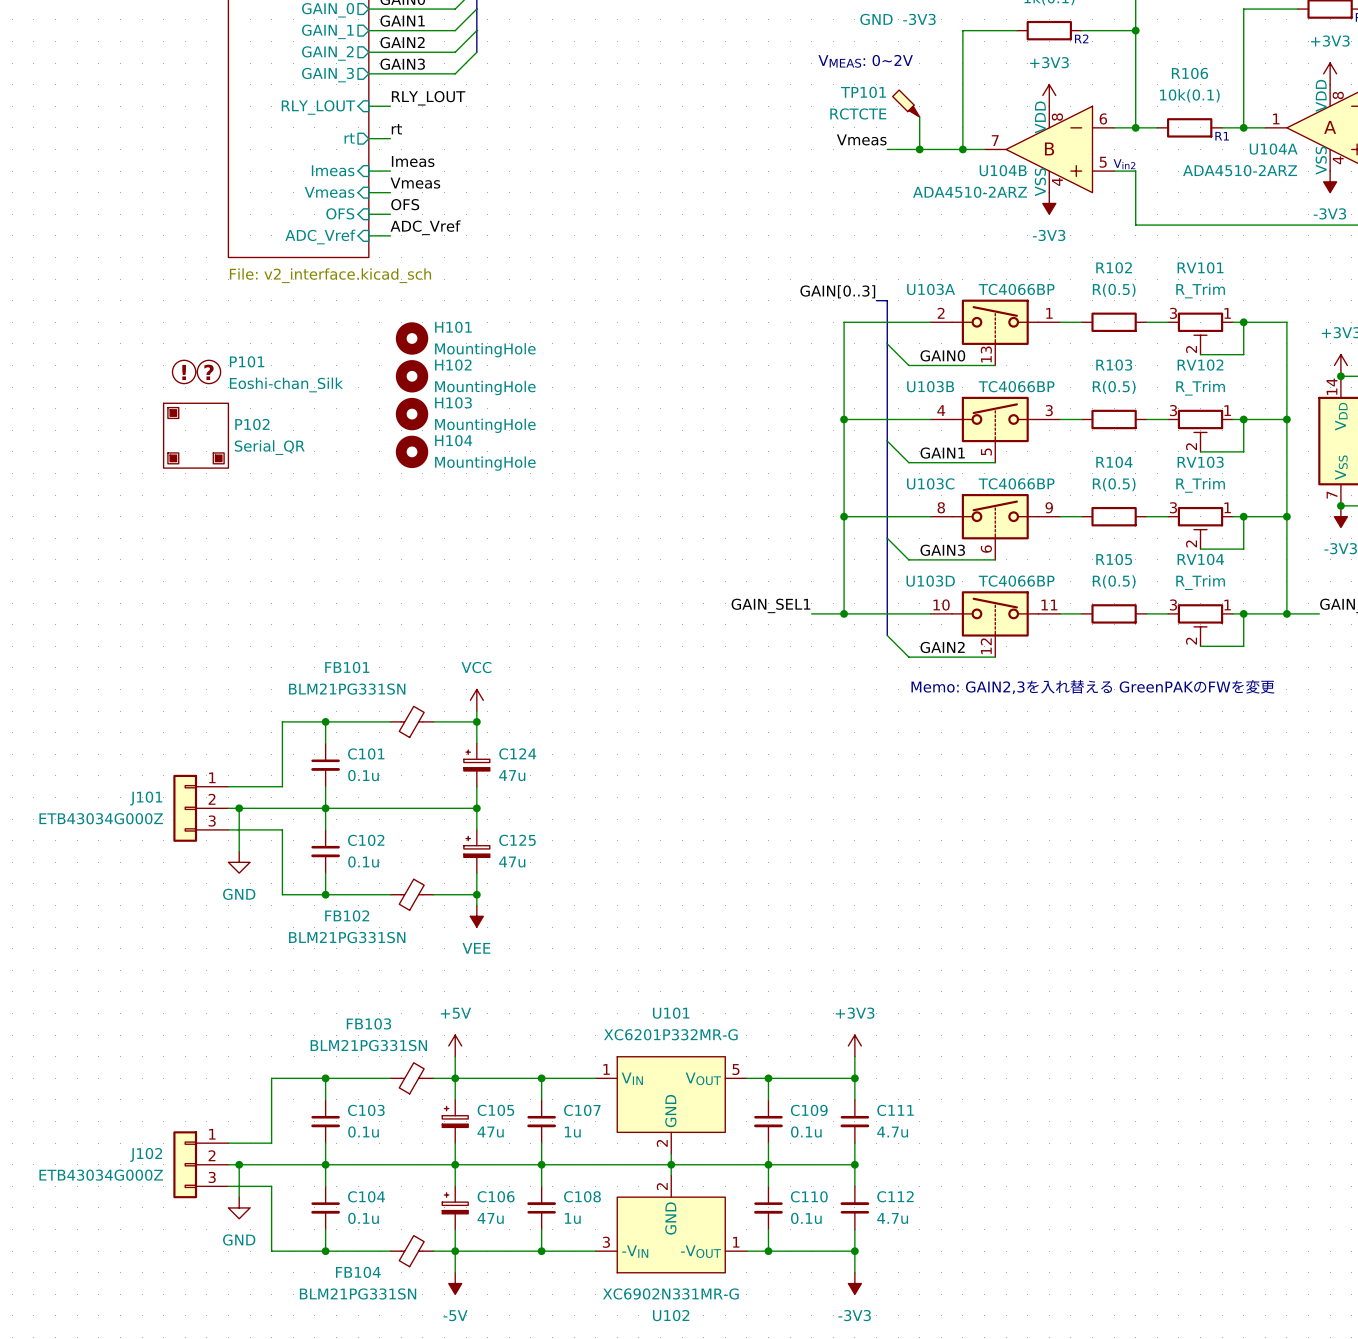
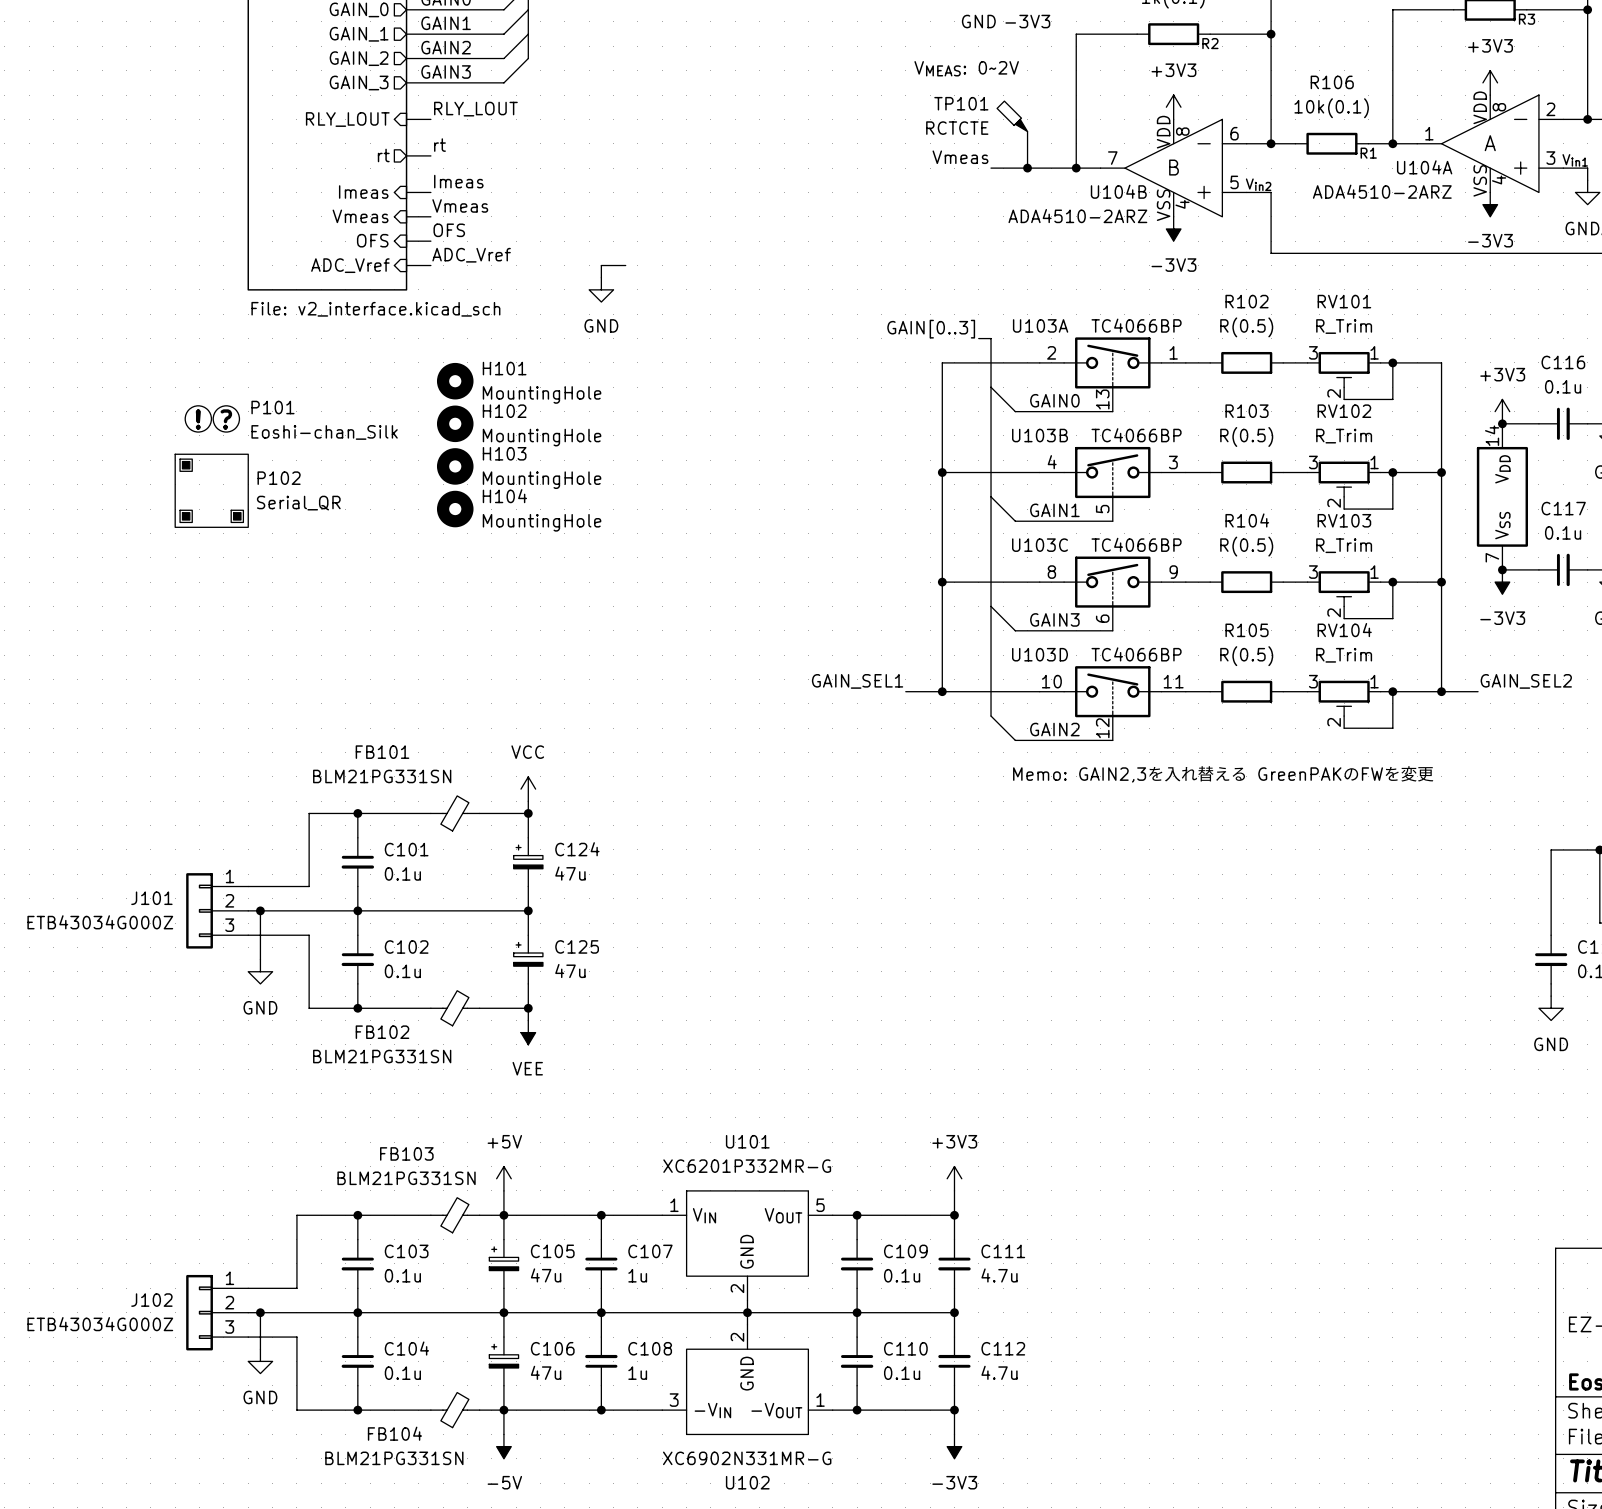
wire: none -> (625, 265) (601, 265) (601, 277)
power symbol: none -> GND (601, 289)

